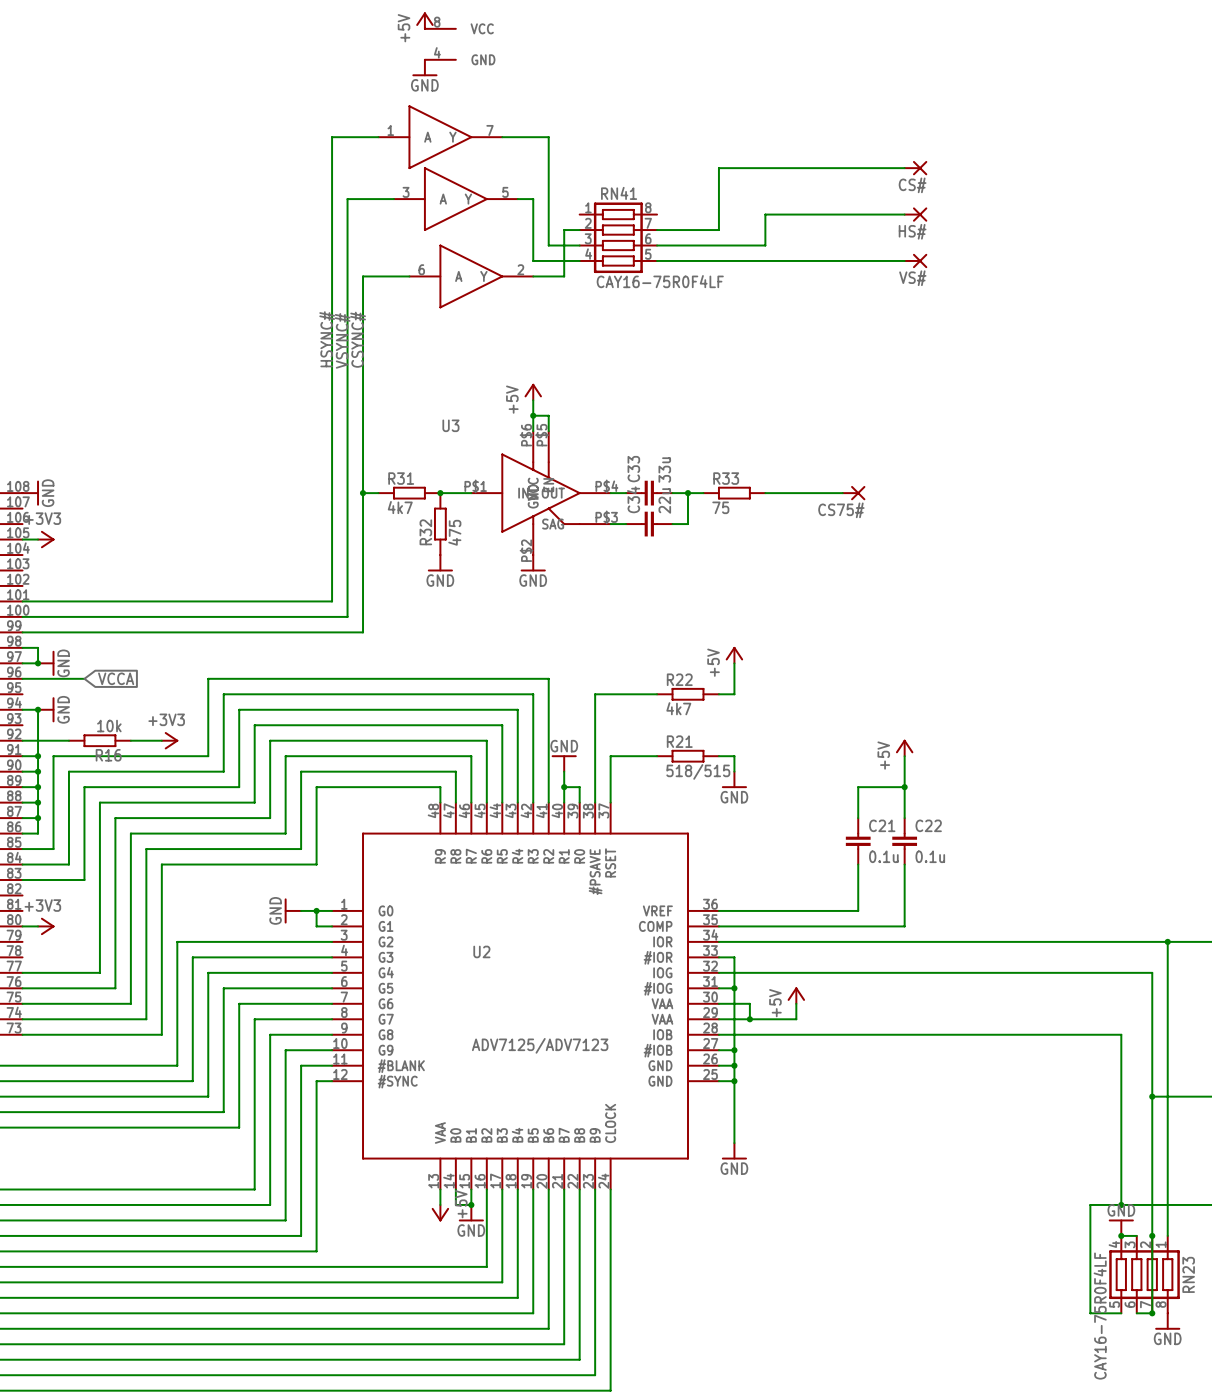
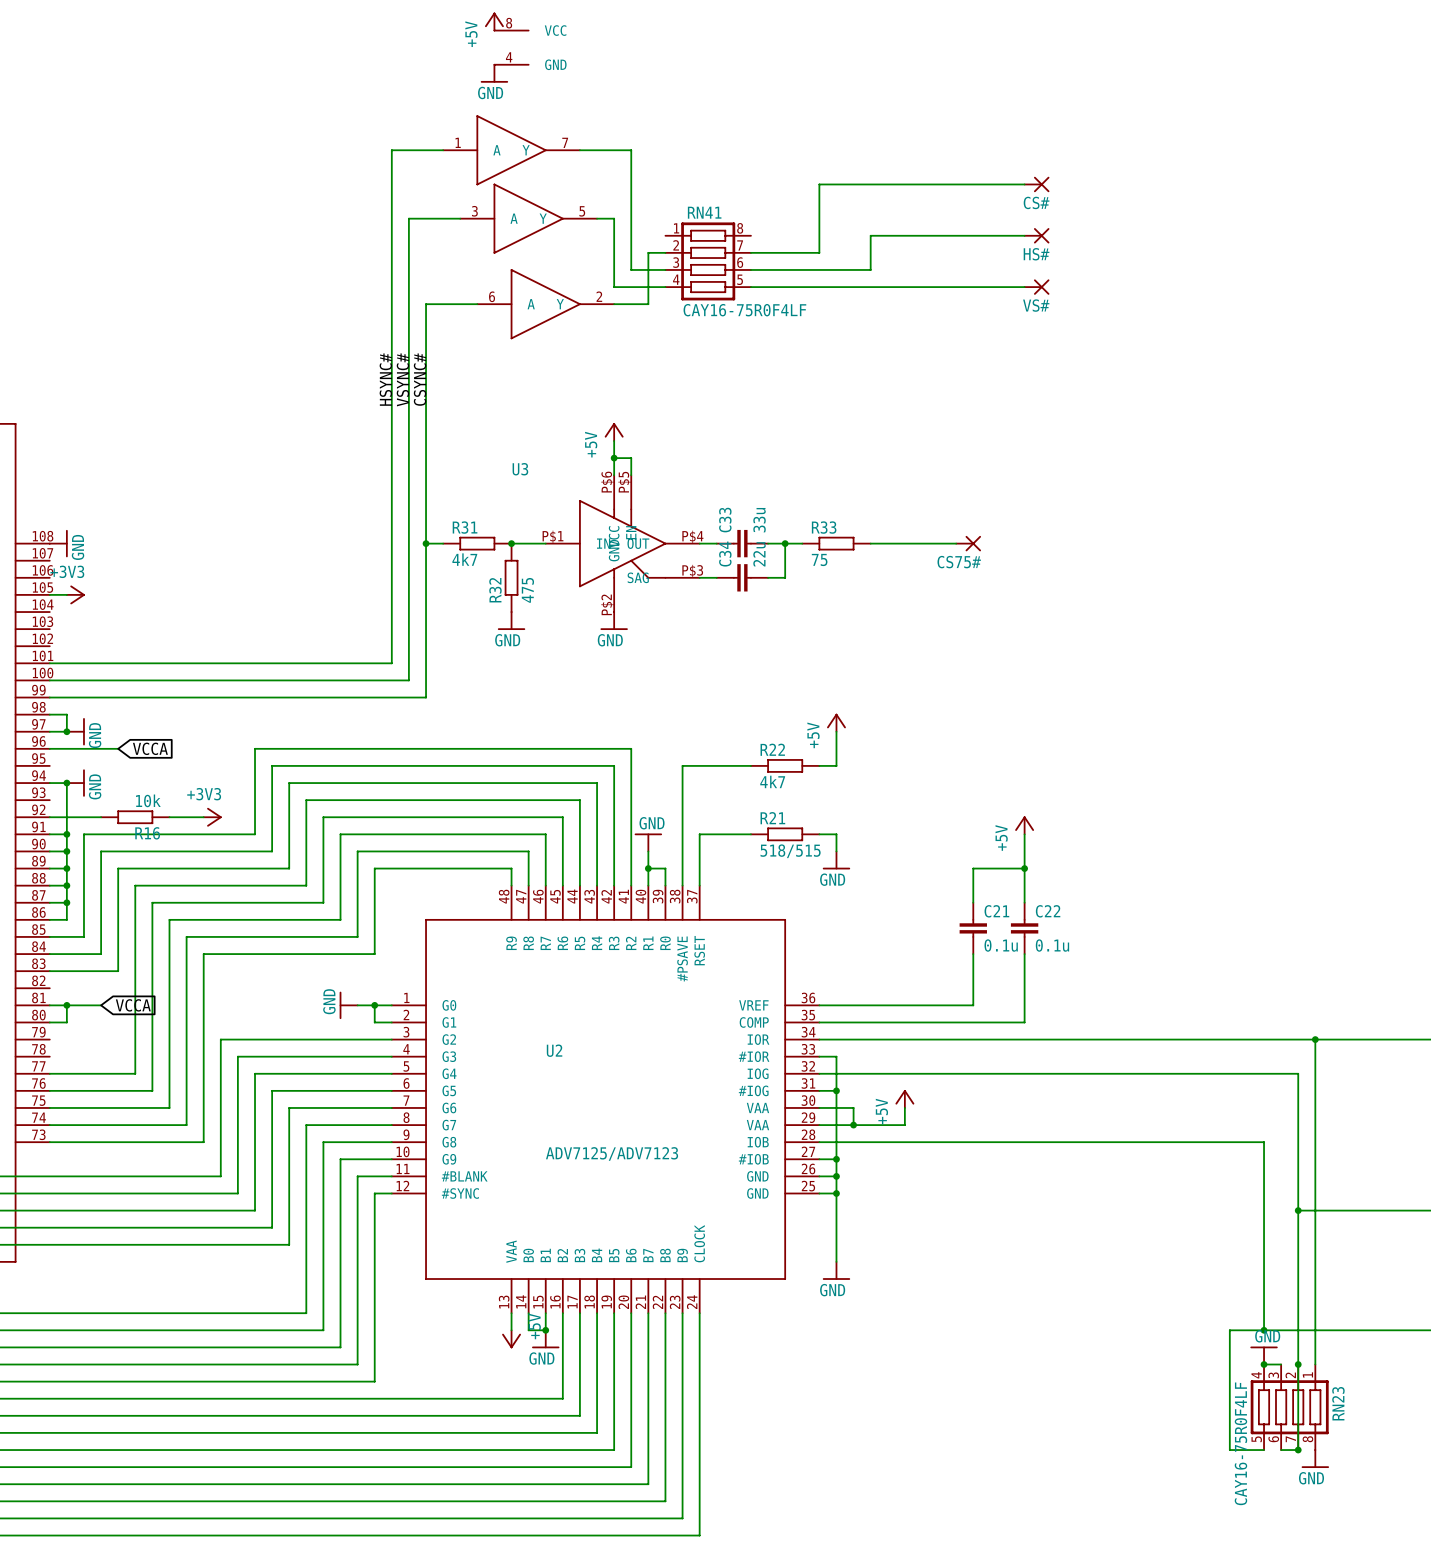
wire: none -> (49, 1005) (101, 1005)
wire: none -> (66, 1005) (66, 1022)
junction: none -> (66, 1005)
global label: none -> VCCA (133, 1005)
power symbol: +3V3 (46, 926) -> none

